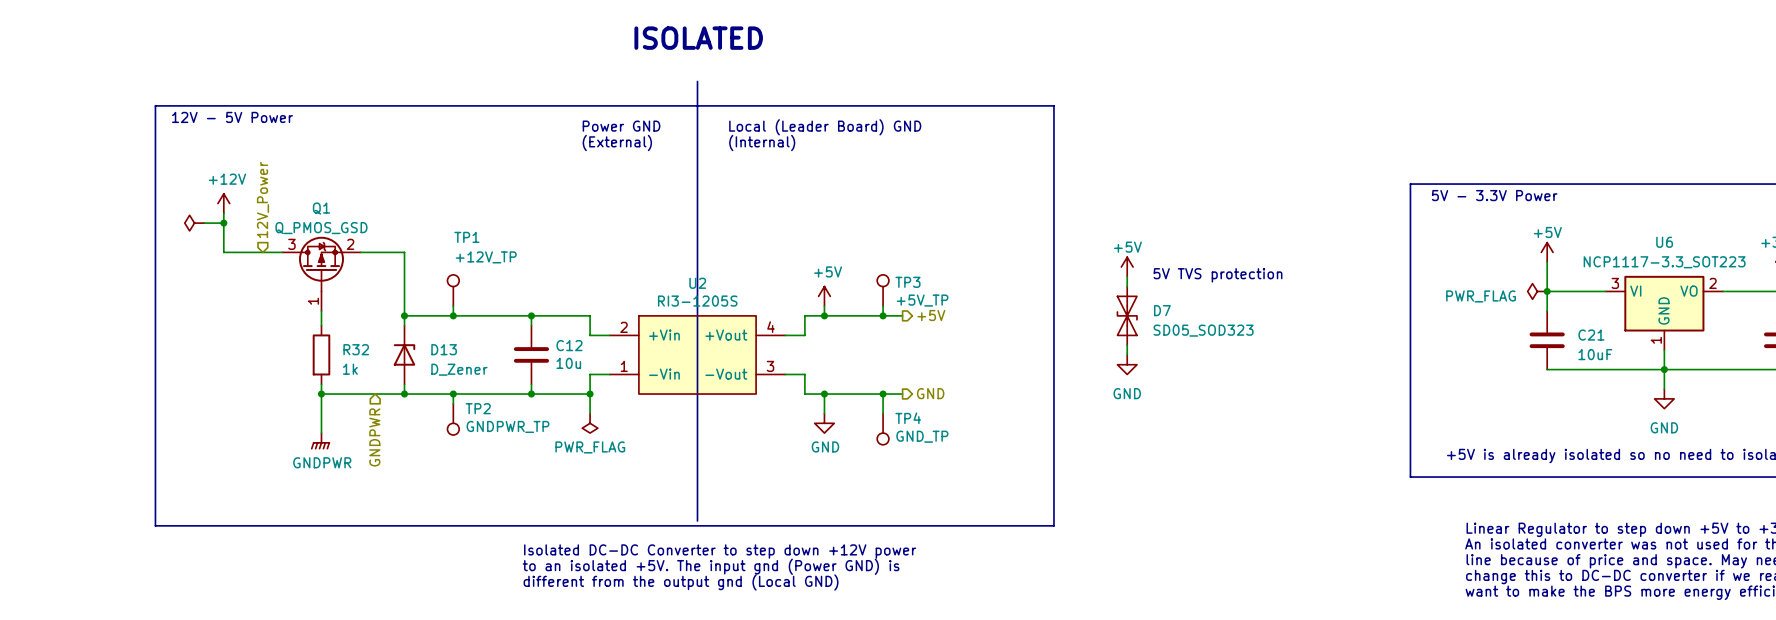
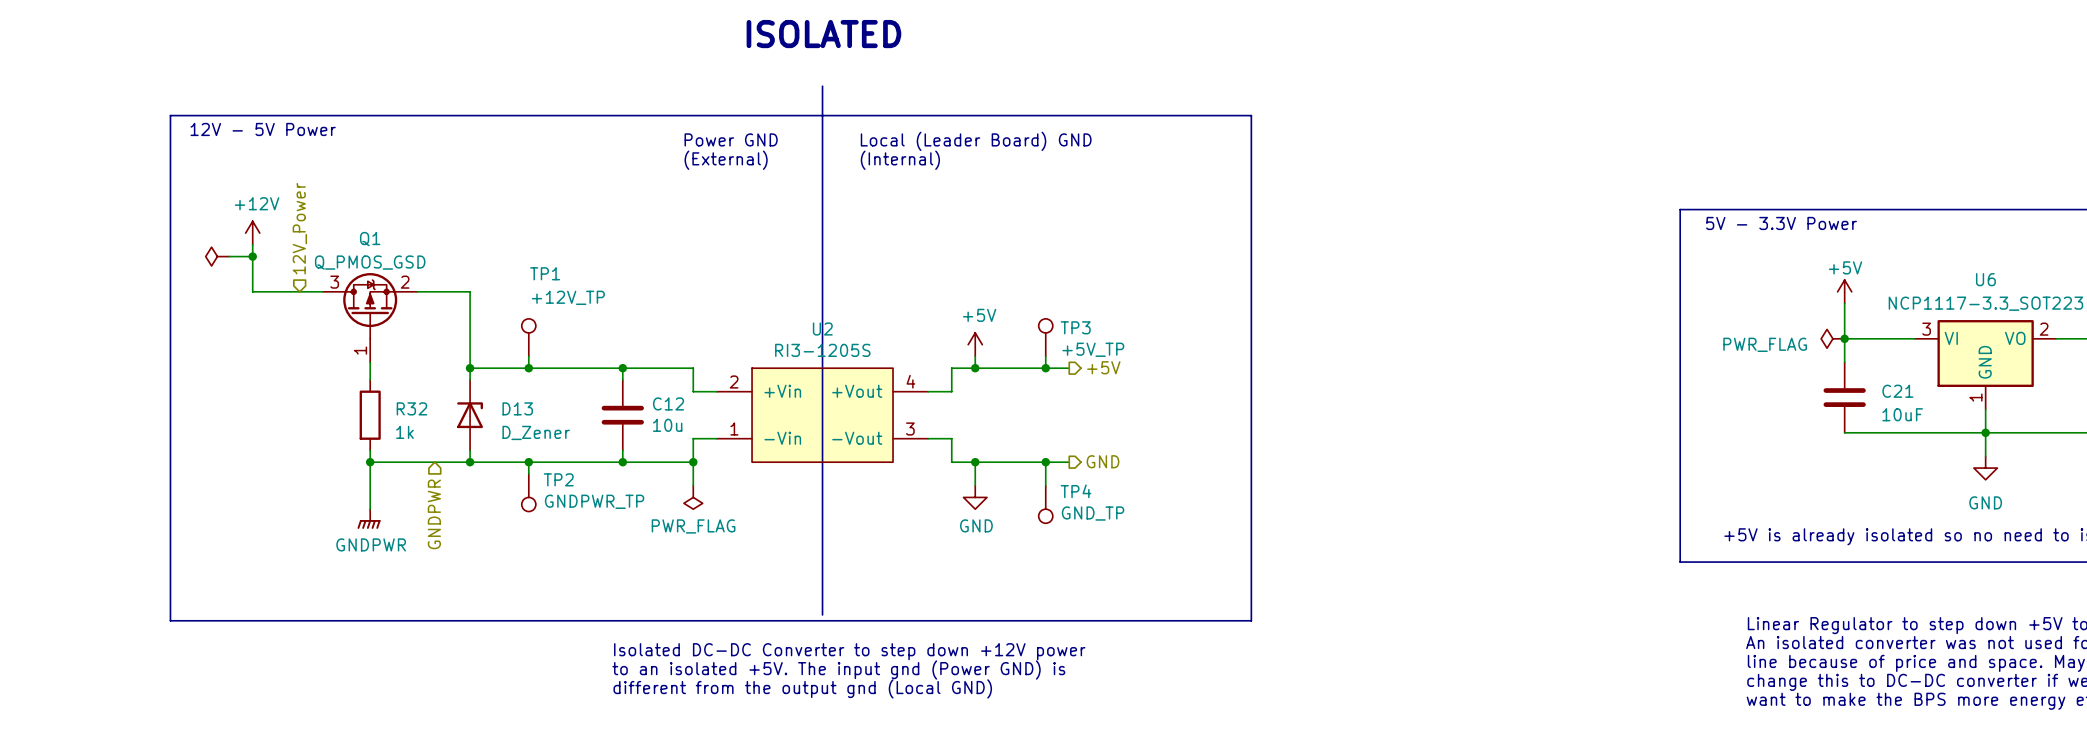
power symbol: +5V (1127, 267) -> none
text: 5V TVS protection (1217, 275) -> none
wire: (1127, 276) (1127, 286) -> none
D7: SD05_SOD323 (1127, 315) -> none
wire: (1127, 345) (1127, 354) -> none
power symbol: GND (1127, 364) -> none

